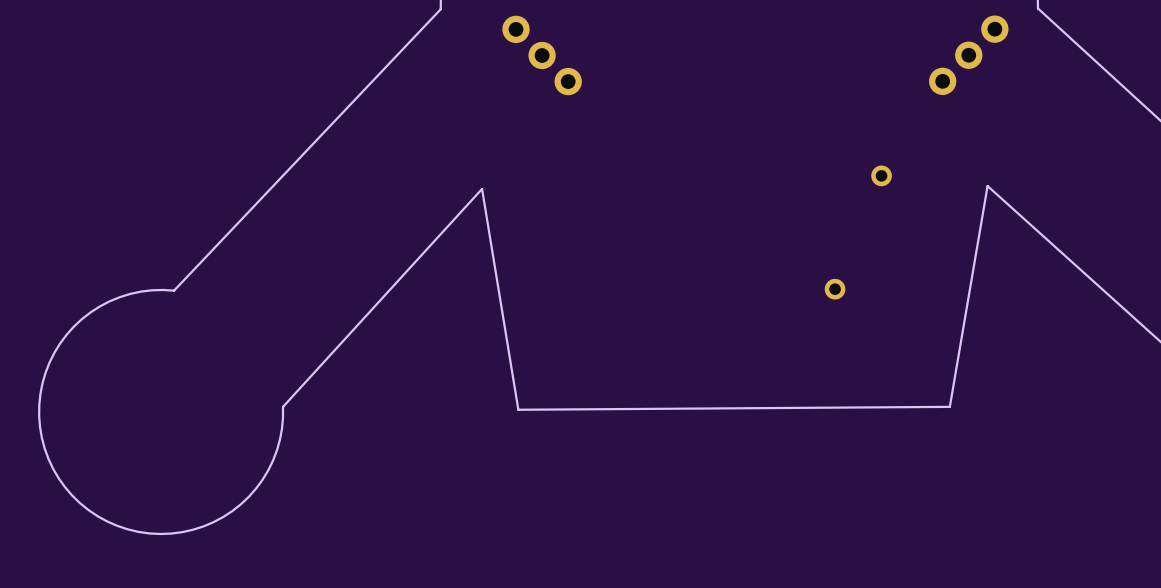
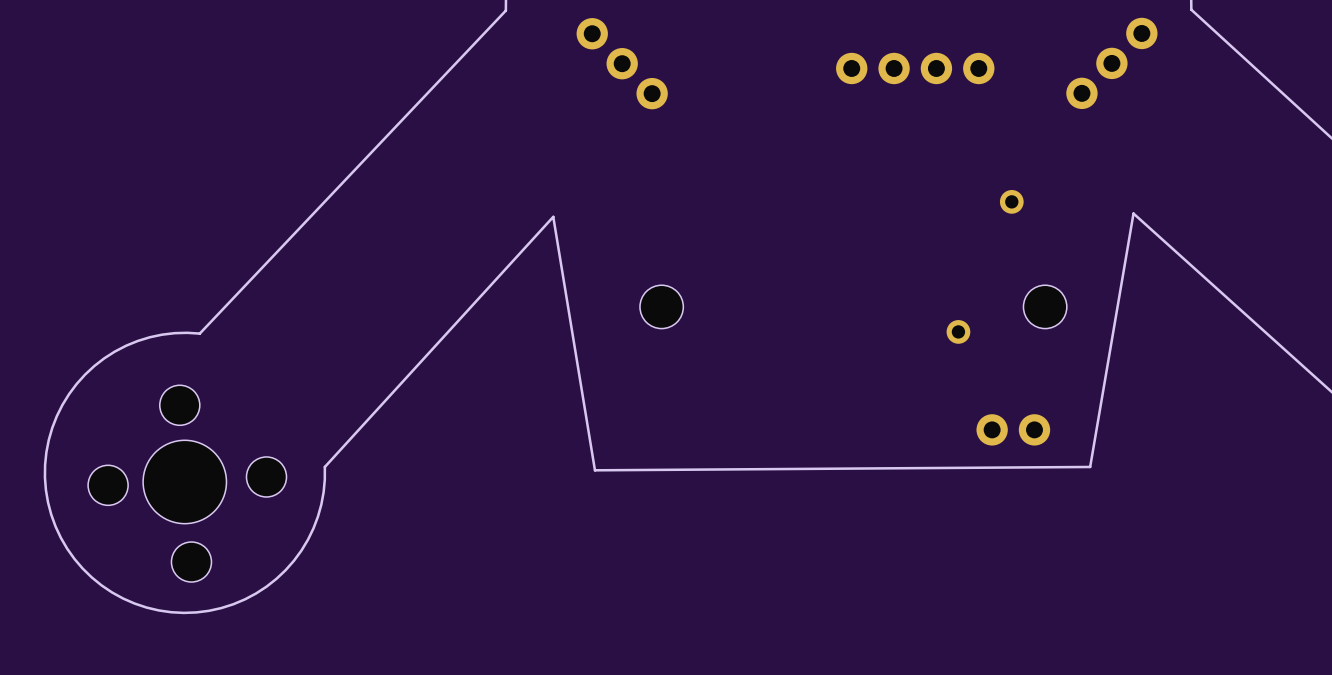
part: none -> (915, 68)
part: none -> (661, 306)
part: none -> (1045, 306)
part: none -> (179, 405)
part: none -> (1013, 429)
part: none -> (266, 476)
part: none -> (184, 481)
part: none -> (108, 485)
part: none -> (191, 562)

